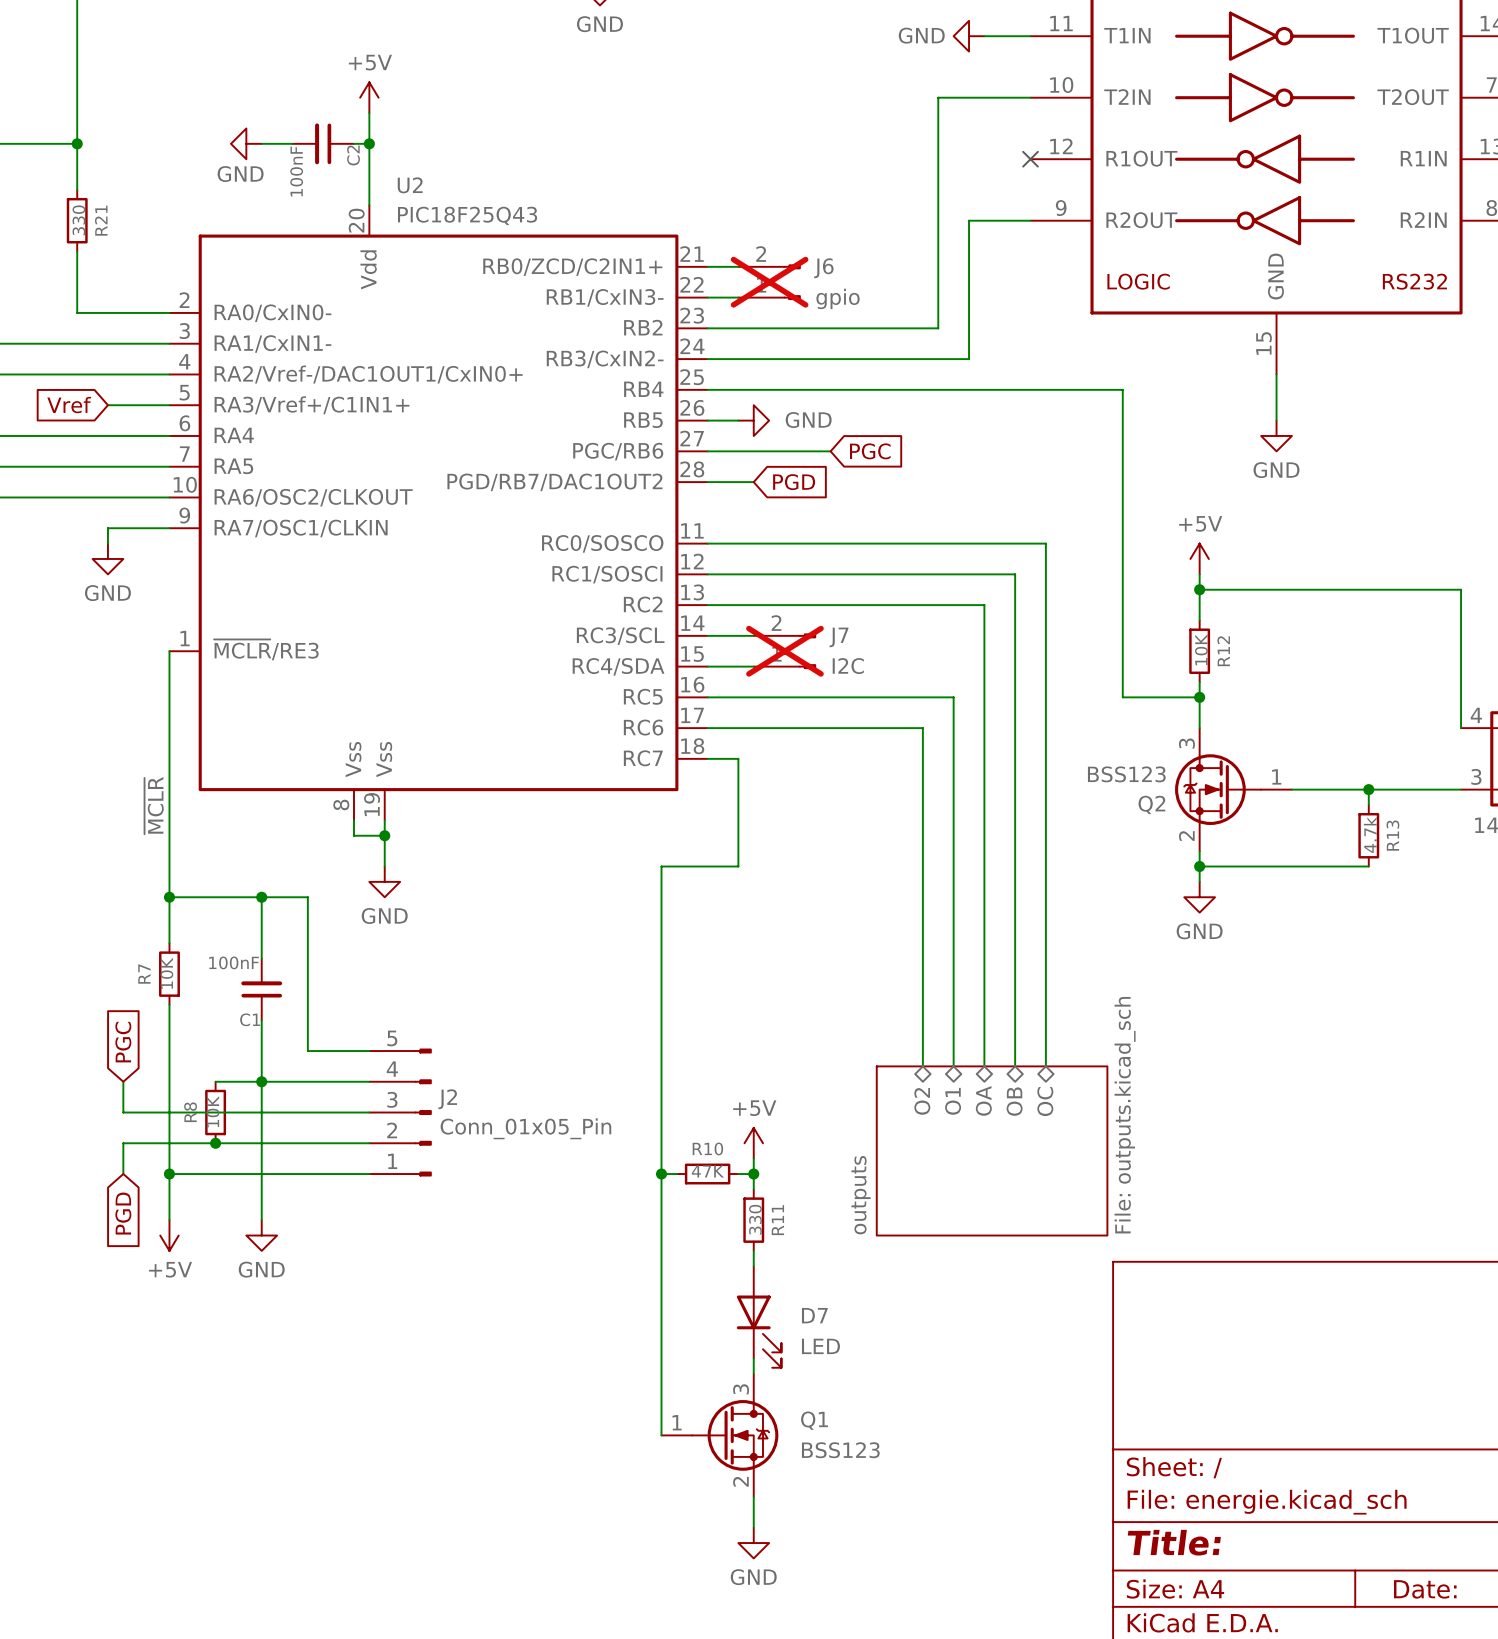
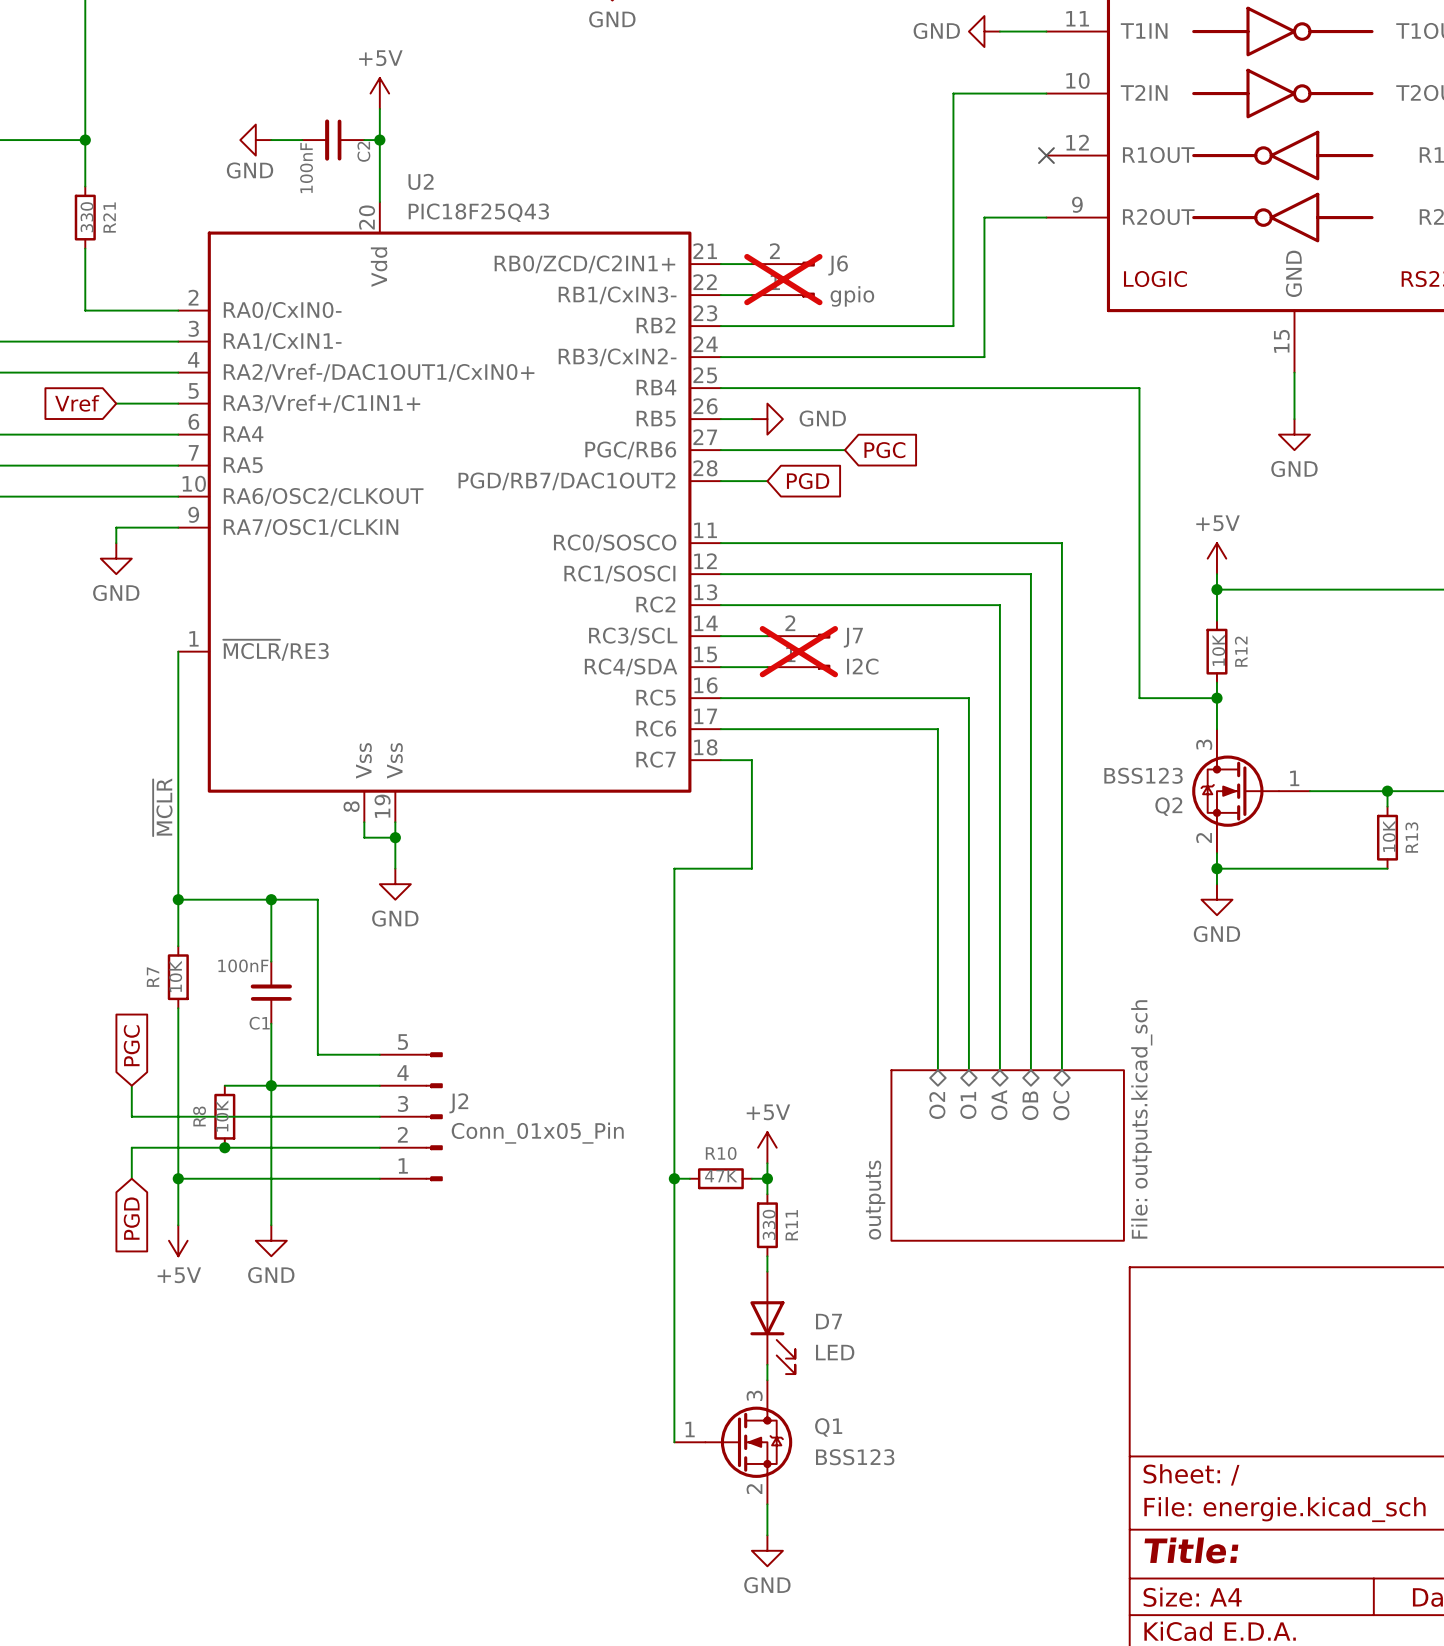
R13 value: 4.7k (1370, 835) -> 10K (1389, 836)

